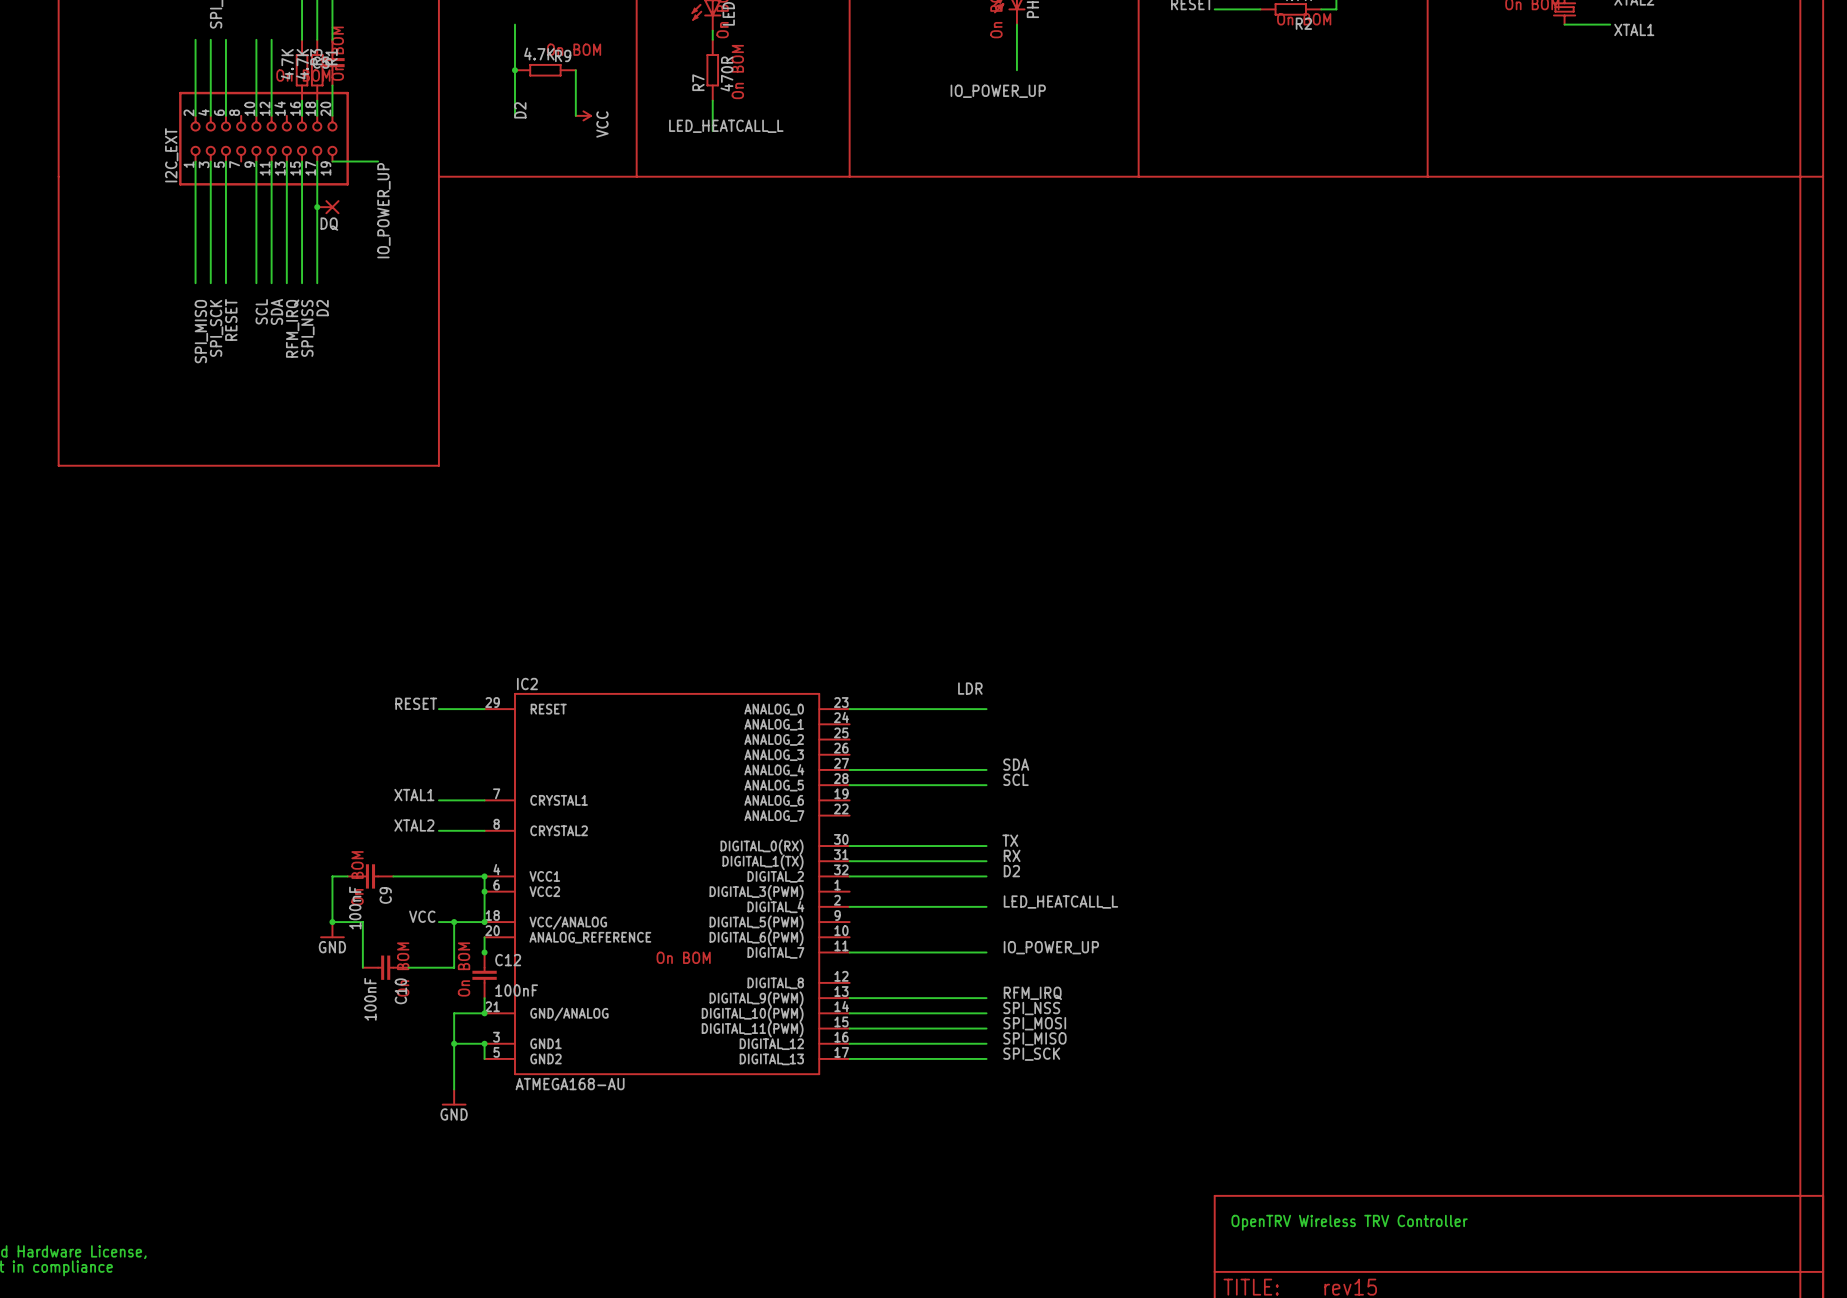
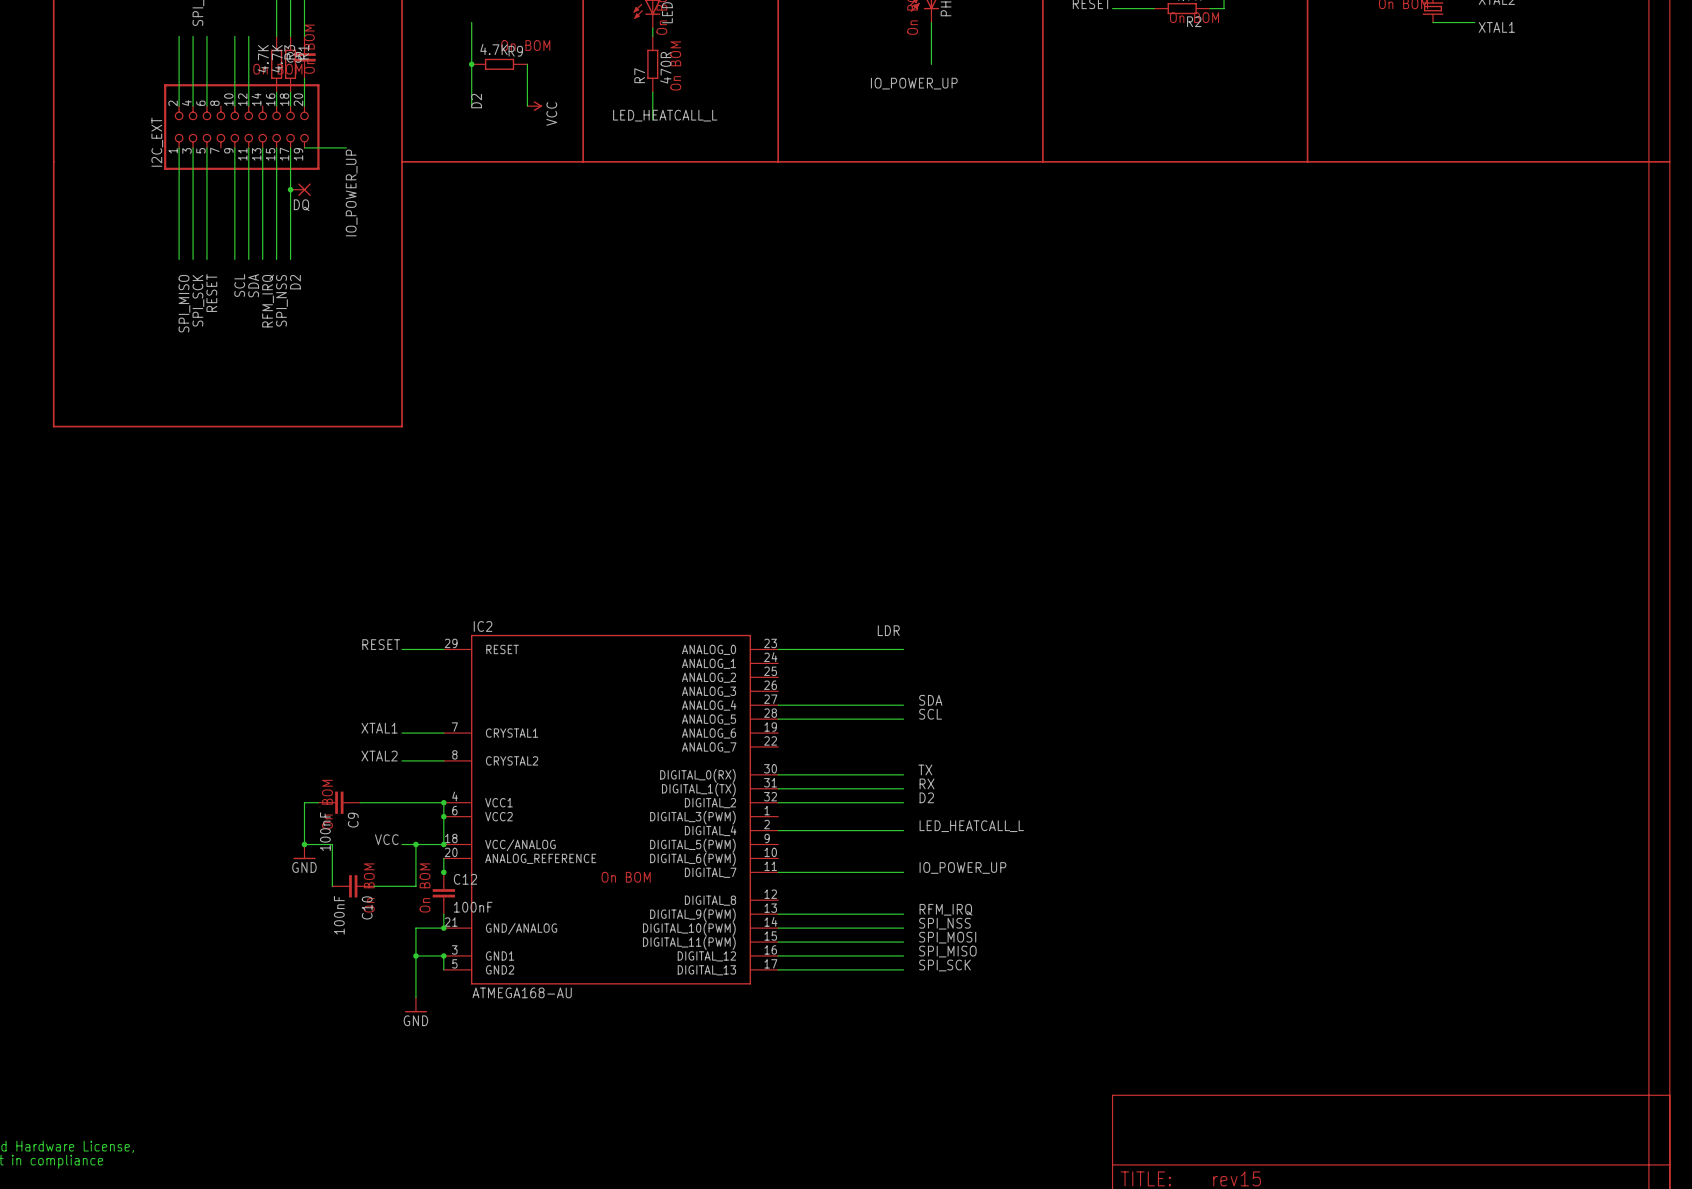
text: OpenTRV Wireless TRV Controller (1349, 1222) -> none

